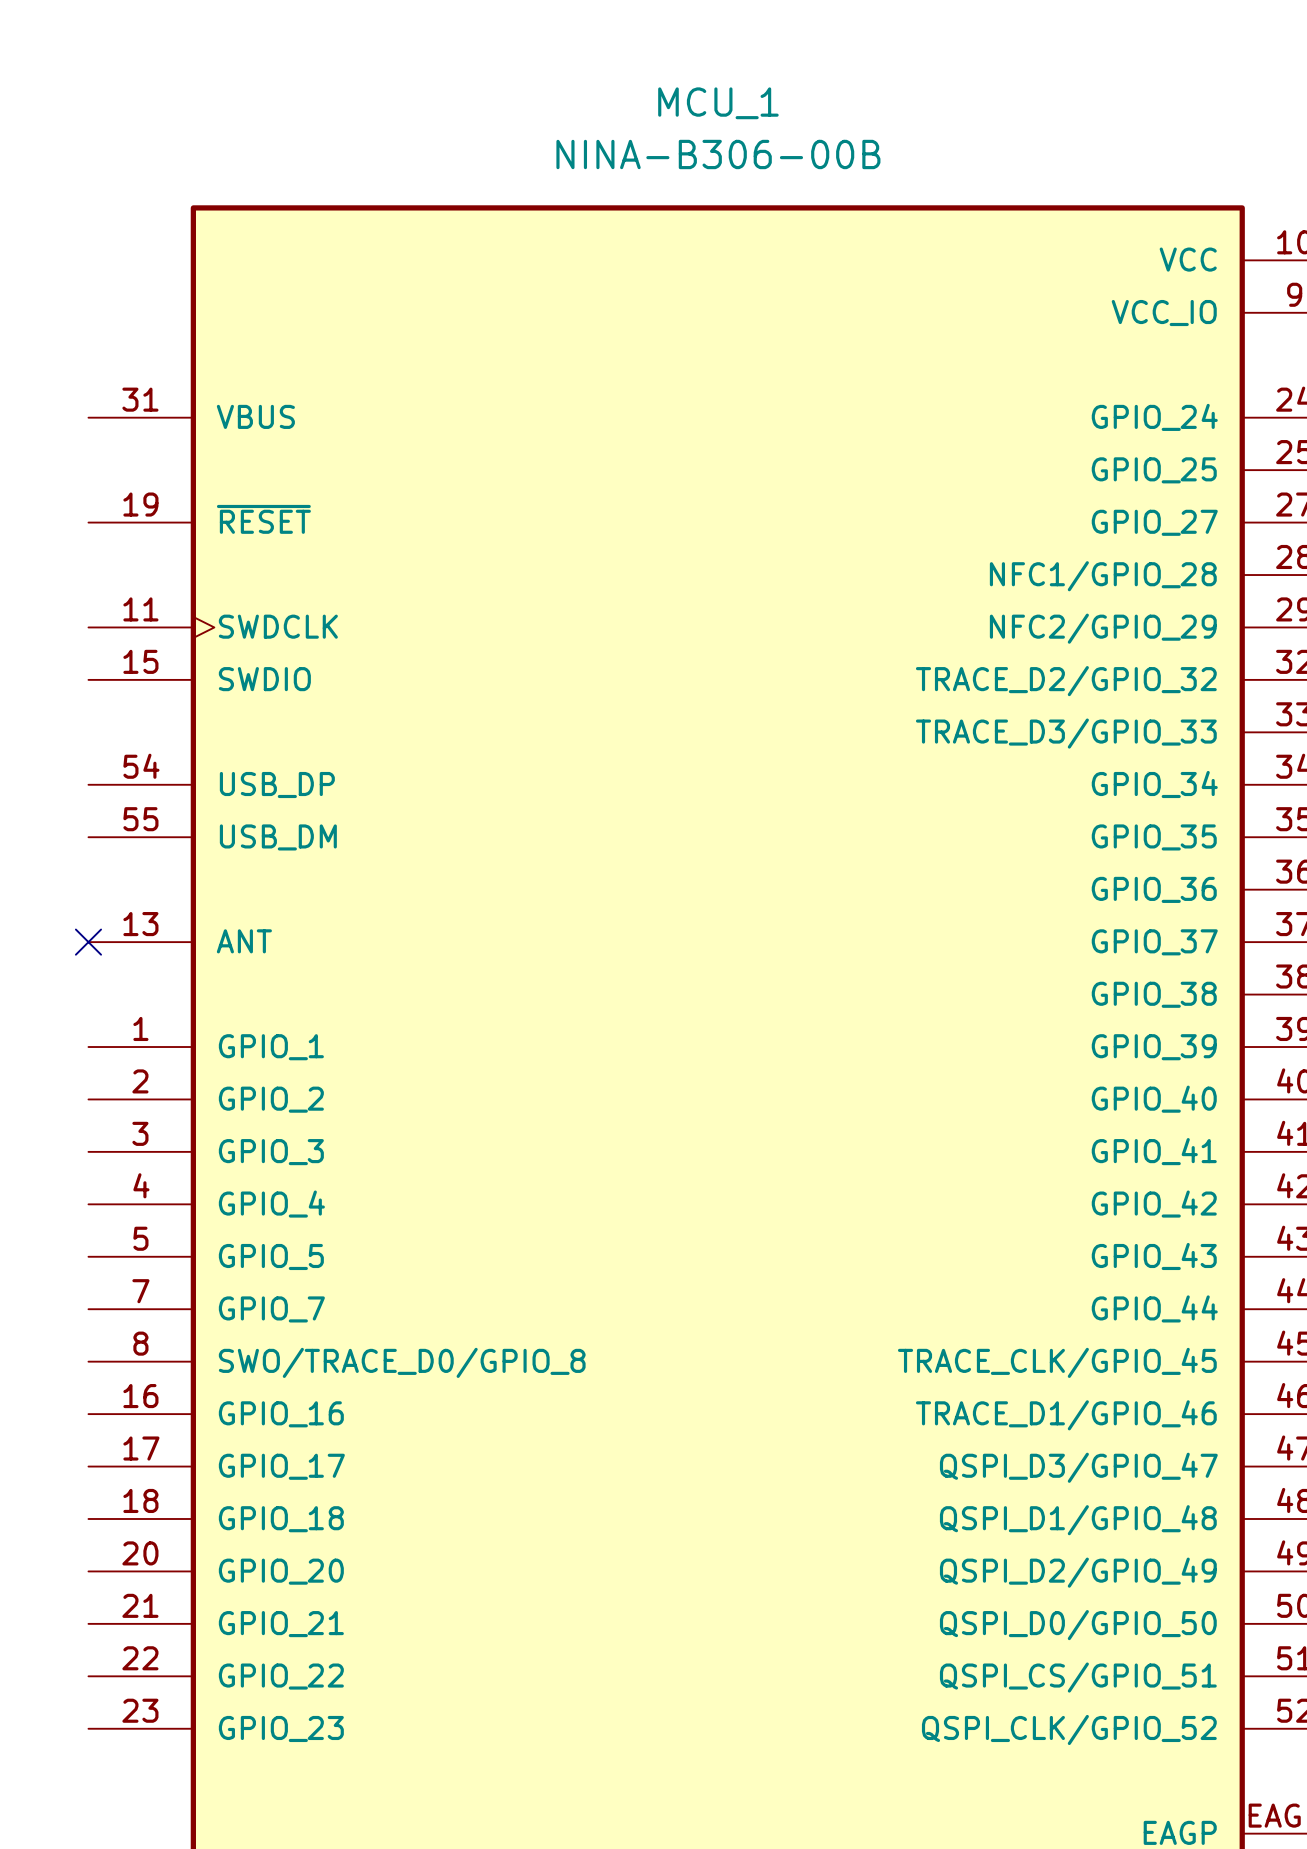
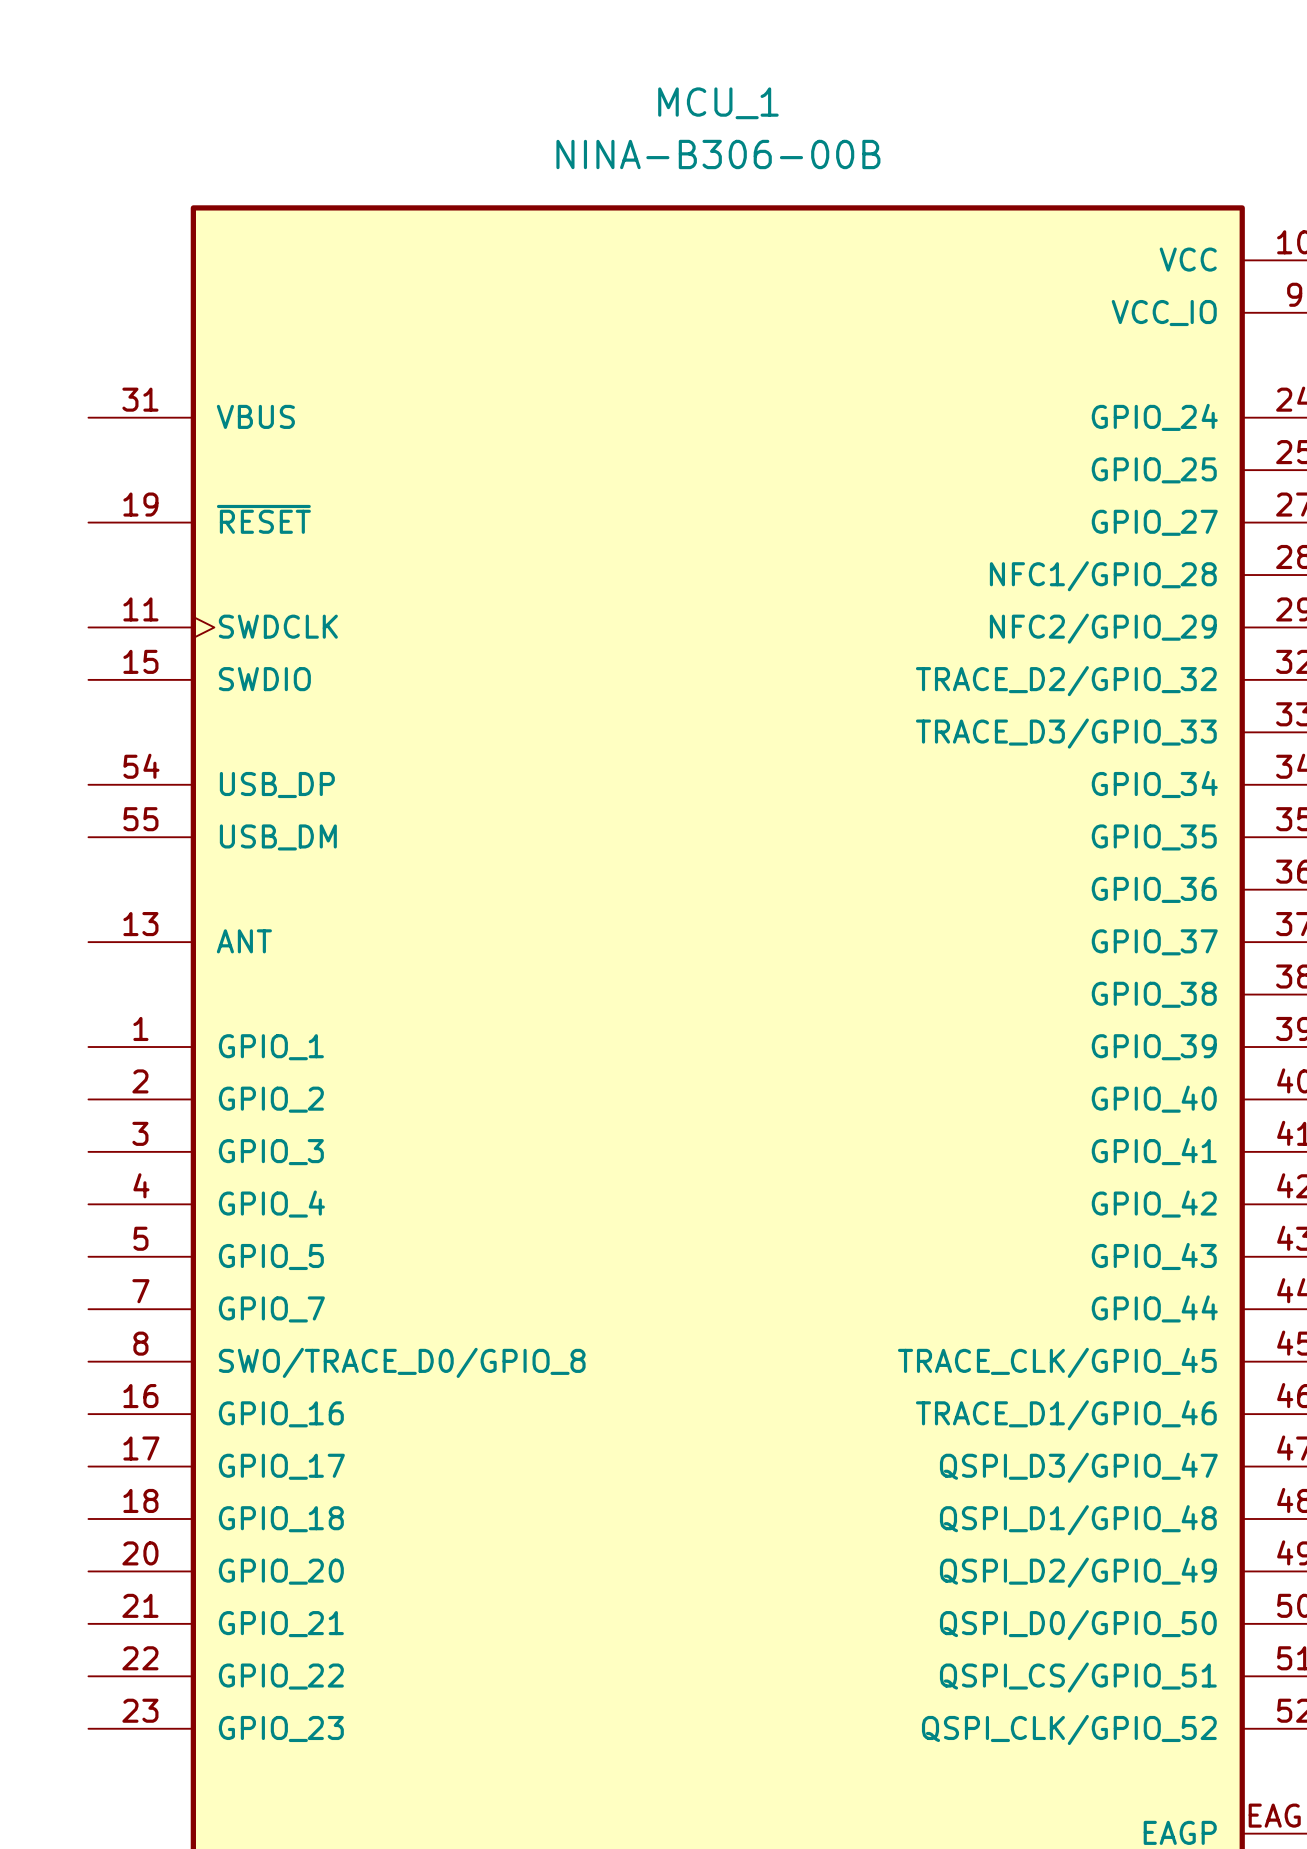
no-connect mark: (88, 942) -> none

